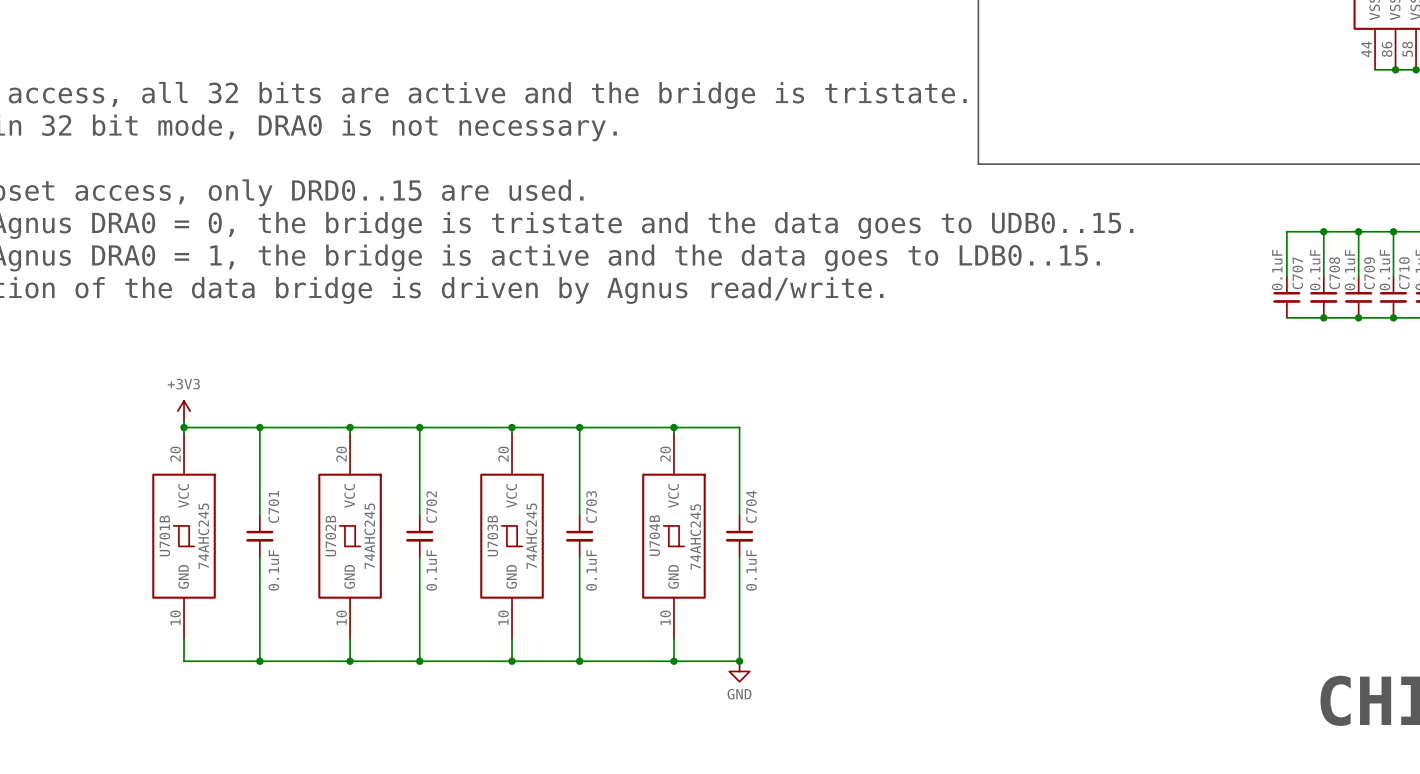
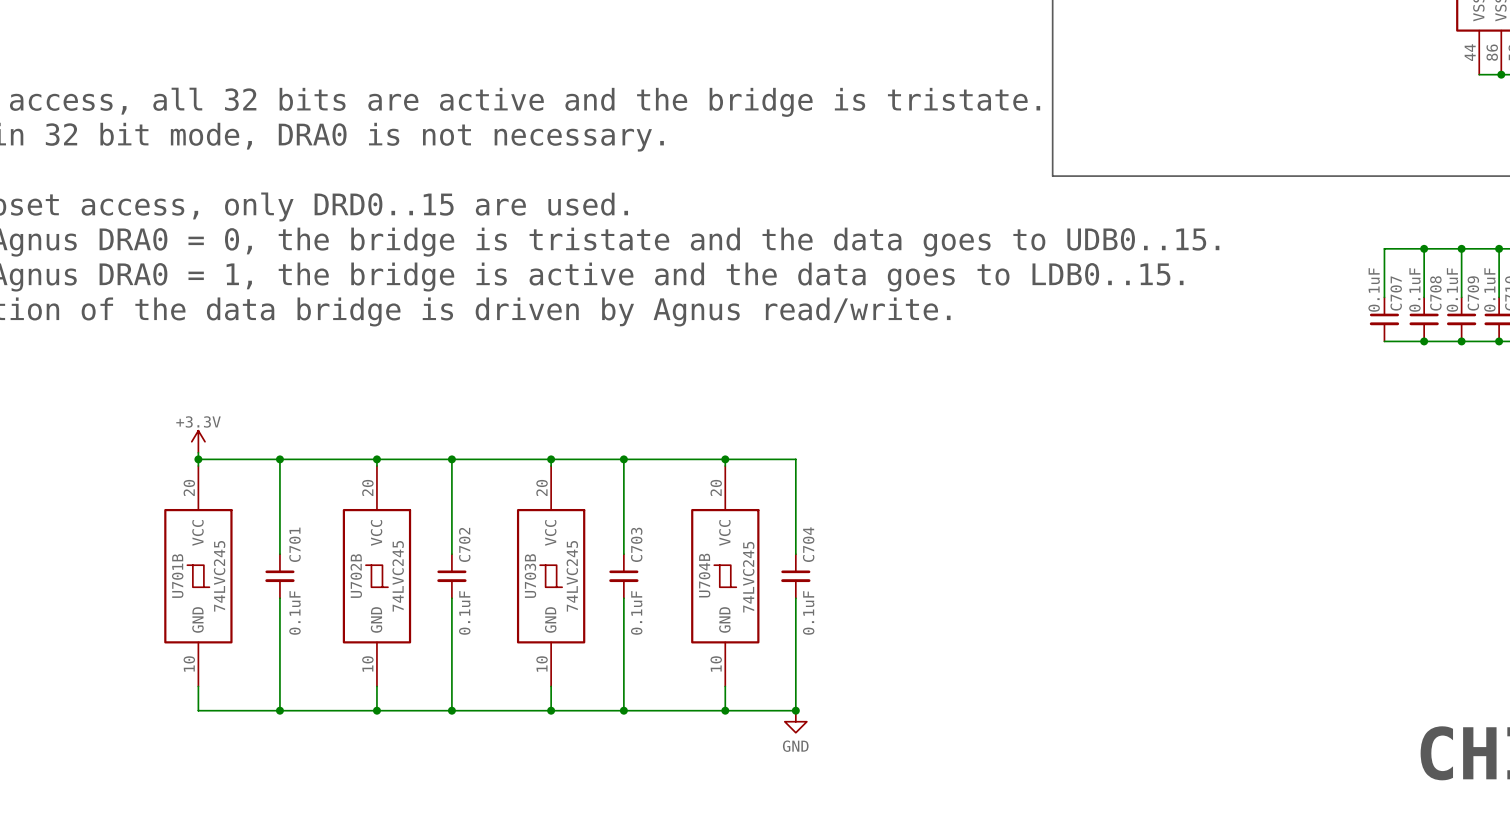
power symbol: +3V3 (184, 411) -> +3.3V (198, 441)
U701B value: 74AHC245 (203, 536) -> 74LVC245 (219, 576)
U702B value: 74AHC245 (369, 536) -> 74LVC245 (398, 576)
U703B value: 74AHC245 (531, 536) -> 74LVC245 (572, 576)
U704B value: 74AHC245 (695, 537) -> 74LVC245 (748, 577)

